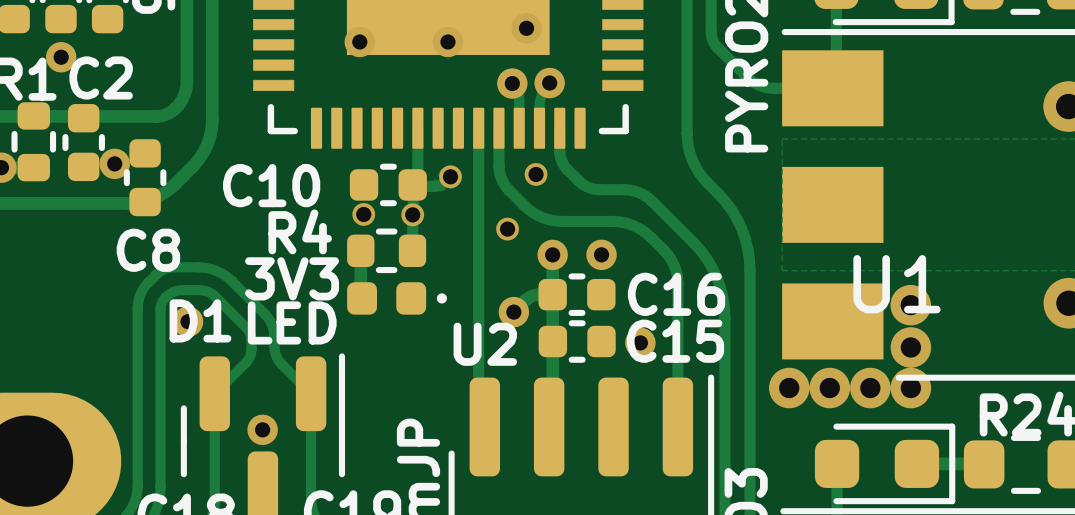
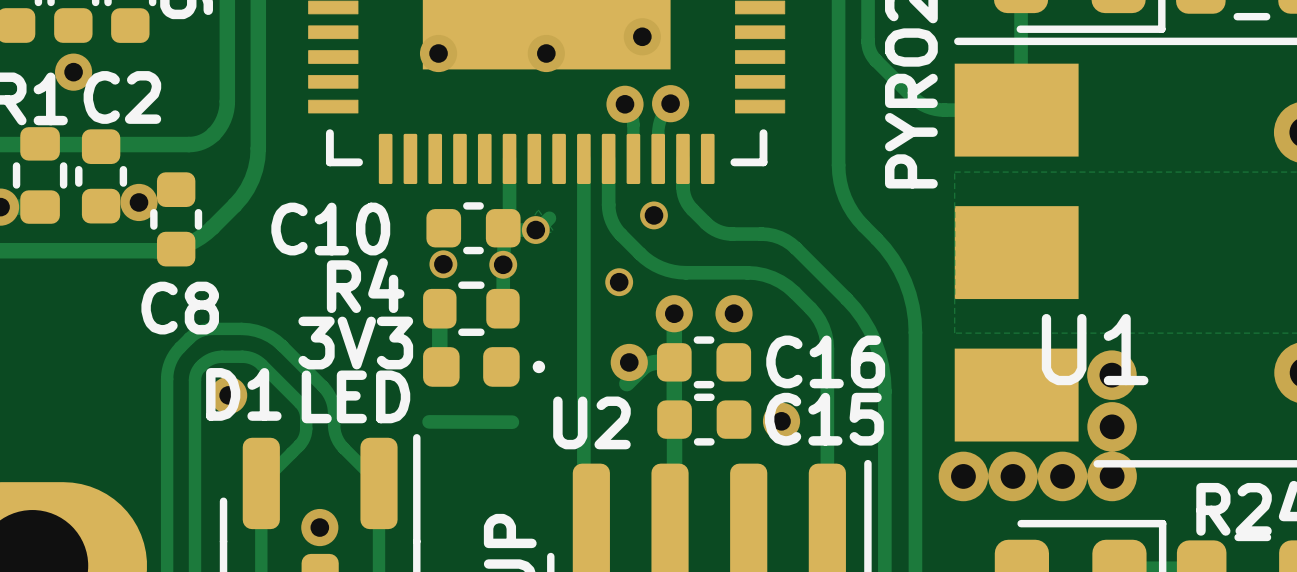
via position: (450, 176) -> (535, 230)
via position: (513, 312) -> (629, 362)
track: none -> (429, 421) (512, 422)

